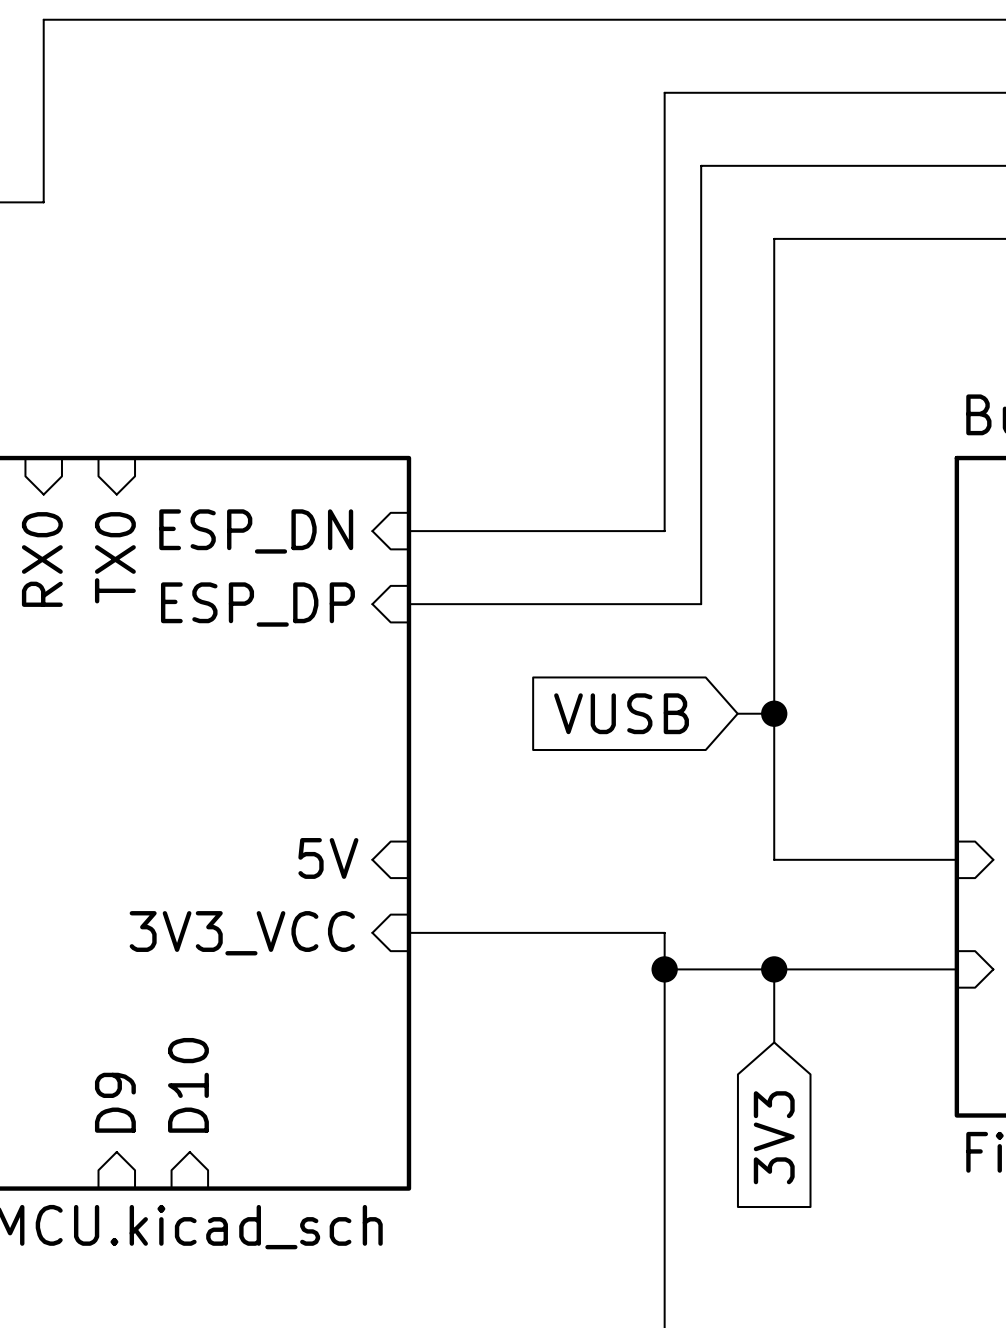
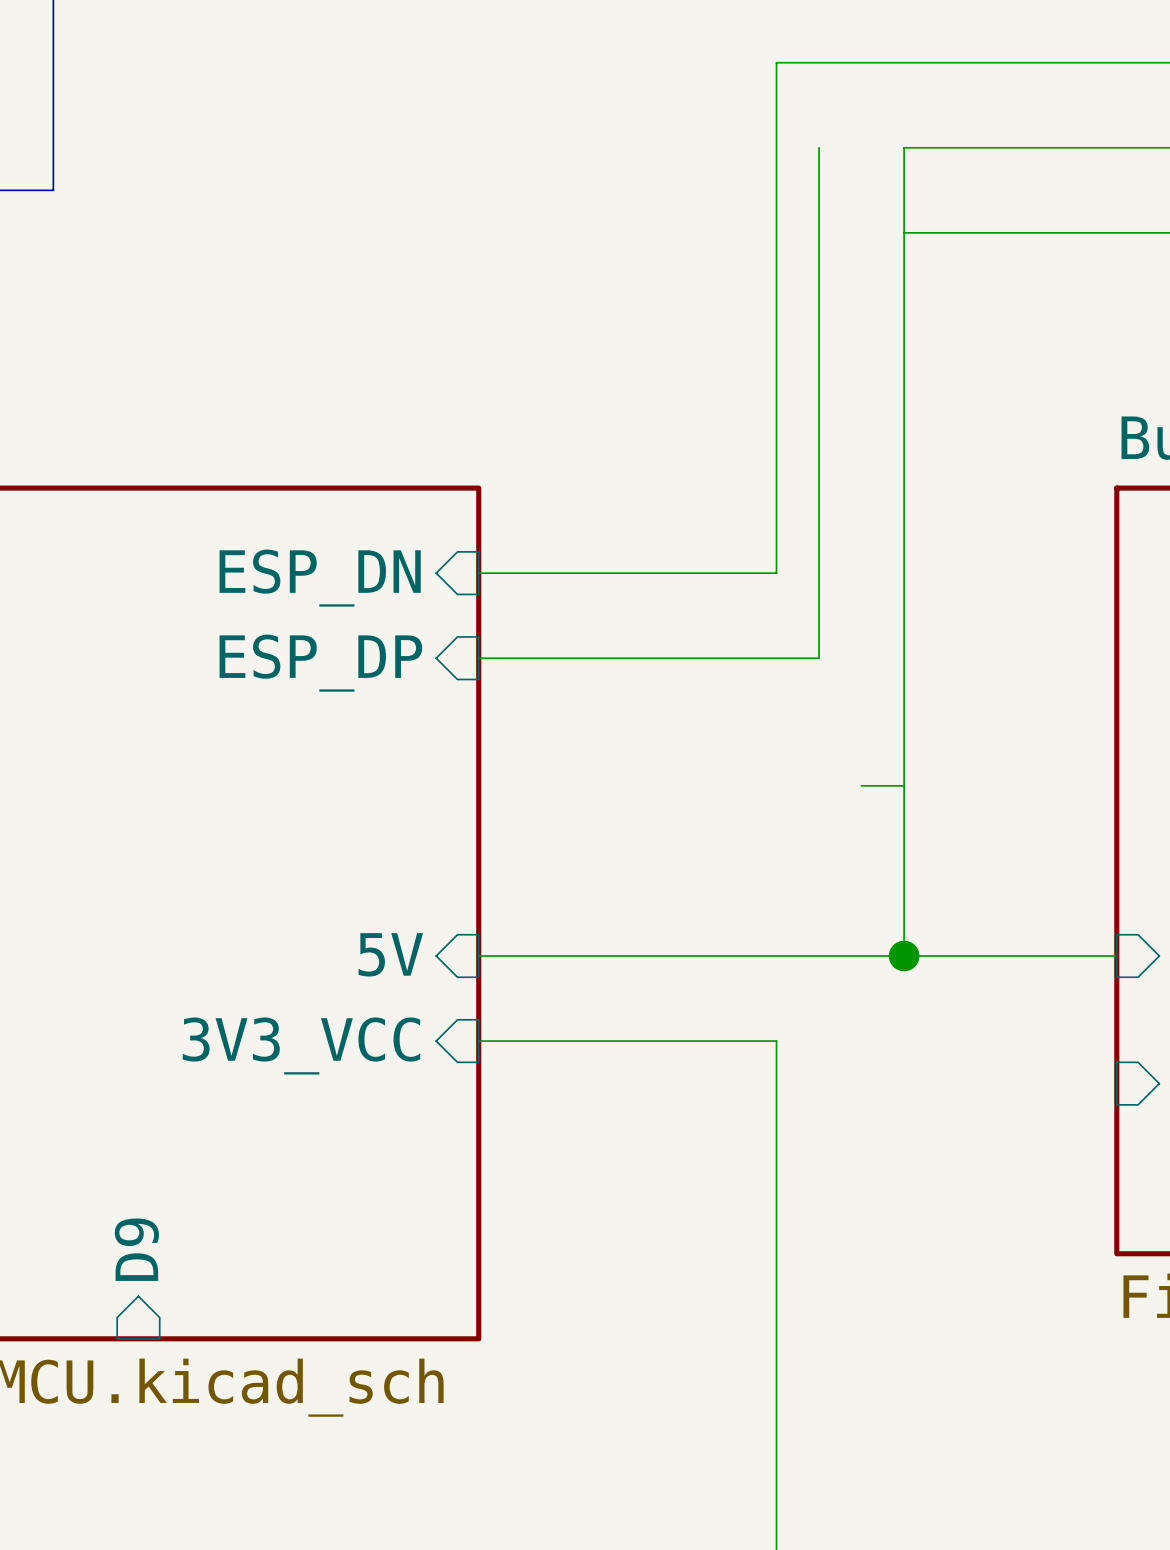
wire: (701, 165) (774, 165) -> (904, 232) (904, 147)
sheet pin: TX0 (115, 557) -> none
sheet pin: RX0 (42, 559) -> none
global label: VUSB (621, 713) -> none
junction: (774, 713) -> none
wire: none -> (478, 955) (904, 955)
junction: none -> (904, 955)
wire: (664, 969) (956, 969) -> none
junction: (664, 969) -> none
wire: (774, 969) (774, 1042) -> none
junction: (774, 969) -> none
sheet pin: D10 (188, 1085) -> none
global label: 3V3 (774, 1137) -> none

